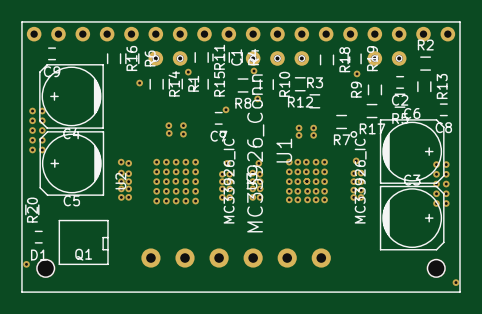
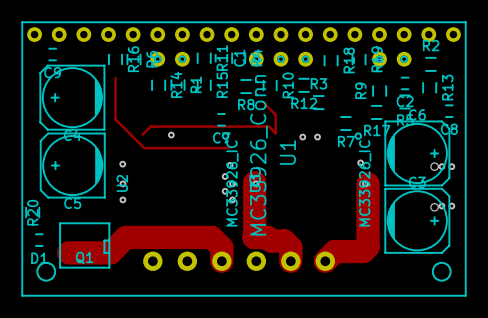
via: (254, 71) -> none
via: (188, 72) -> none
via: (357, 73) -> none
track: none -> (115, 77) (115, 119) (144, 148) (230, 148)
via: (139, 83) -> none
via: (257, 98) -> none
track: none -> (263, 102) (275, 114) (275, 133) (268, 126) (150, 126) (142, 134)
via: (226, 109) -> none
via: (32, 111) -> none
via: (42, 111) -> none
via: (32, 120) -> none
via: (42, 120) -> none
via: (168, 125) -> none
via: (183, 125) -> none
via: (299, 128) -> none
via: (313, 128) -> none
via: (32, 130) -> none
via: (42, 130) -> none
via: (183, 134) -> none
via: (32, 140) -> none
via: (42, 140) -> none
via: (32, 149) -> none
via: (42, 149) -> none
via: (156, 162) -> none
via: (166, 162) -> none
via: (176, 162) -> none
via: (185, 162) -> none
via: (195, 162) -> none
via: (289, 162) -> none
via: (297, 162) -> none
via: (306, 162) -> none
via: (316, 162) -> none
via: (324, 162) -> none
via: (128, 163) -> none
via: (258, 163) -> none
via: none -> (434, 166)
via: (156, 171) -> none
via: (166, 171) -> none
via: (176, 171) -> none
via: (185, 171) -> none
via: (195, 171) -> none
via: (289, 171) -> none
via: (297, 171) -> none
via: (306, 171) -> none
via: (316, 171) -> none
via: (324, 171) -> none
via: (121, 173) -> none
via: (128, 173) -> none
via: (252, 173) -> none
via: (353, 173) -> none
via: (361, 173) -> none
via: (229, 174) -> none
via: (259, 174) -> none
via: (436, 174) -> none
via: (446, 174) -> none
track: none -> (254, 182) (254, 237) (267, 237) (271, 241) (284, 241) (290, 247) (290, 261)
via: (128, 181) -> none
via: (156, 181) -> none
via: (166, 181) -> none
via: (175, 181) -> none
via: (185, 181) -> none
via: (195, 181) -> none
via: (222, 181) -> none
via: (260, 181) -> none
via: (289, 181) -> none
via: (297, 181) -> none
via: (306, 181) -> none
via: (316, 181) -> none
via: (324, 181) -> none
via: (353, 181) -> none
track: none -> (368, 183) (368, 246) (363, 251) (335, 251) (325, 261)
via: (436, 184) -> none
via: (446, 184) -> none
via: (121, 188) -> none
via: (128, 188) -> none
via: (229, 188) -> none
via: (252, 188) -> none
via: (260, 188) -> none
via: (353, 190) -> none
via: (361, 190) -> none
via: (156, 191) -> none
via: (166, 191) -> none
via: (176, 191) -> none
via: (185, 191) -> none
via: (195, 191) -> none
via: (289, 191) -> none
via: (297, 191) -> none
via: (307, 191) -> none
via: (316, 191) -> none
via: (324, 191) -> none
via: (436, 193) -> none
via: (446, 193) -> none
via: (128, 197) -> none
via: (222, 197) -> none
via: (252, 197) -> none
via: (260, 197) -> none
via: (353, 197) -> none
via: (361, 197) -> none
via: (289, 199) -> none
via: (297, 199) -> none
via: (307, 199) -> none
via: (316, 199) -> none
via: (324, 199) -> none
via: (156, 201) -> none
via: (166, 201) -> none
via: (176, 201) -> none
via: (185, 201) -> none
via: (195, 201) -> none
via: none -> (434, 207)
track: none -> (68, 252) (110, 252) (126, 237) (211, 237) (221, 247) (221, 261)
via: (26, 264) -> none
via: (455, 282) -> none

